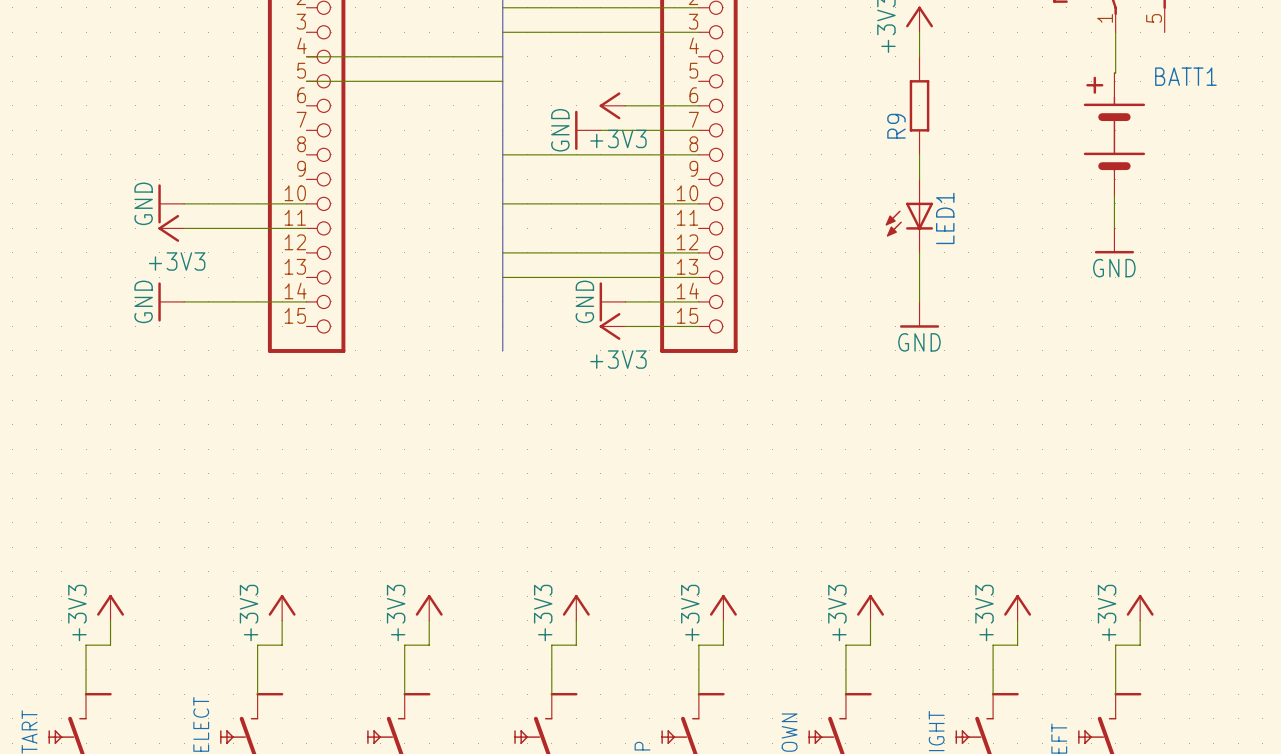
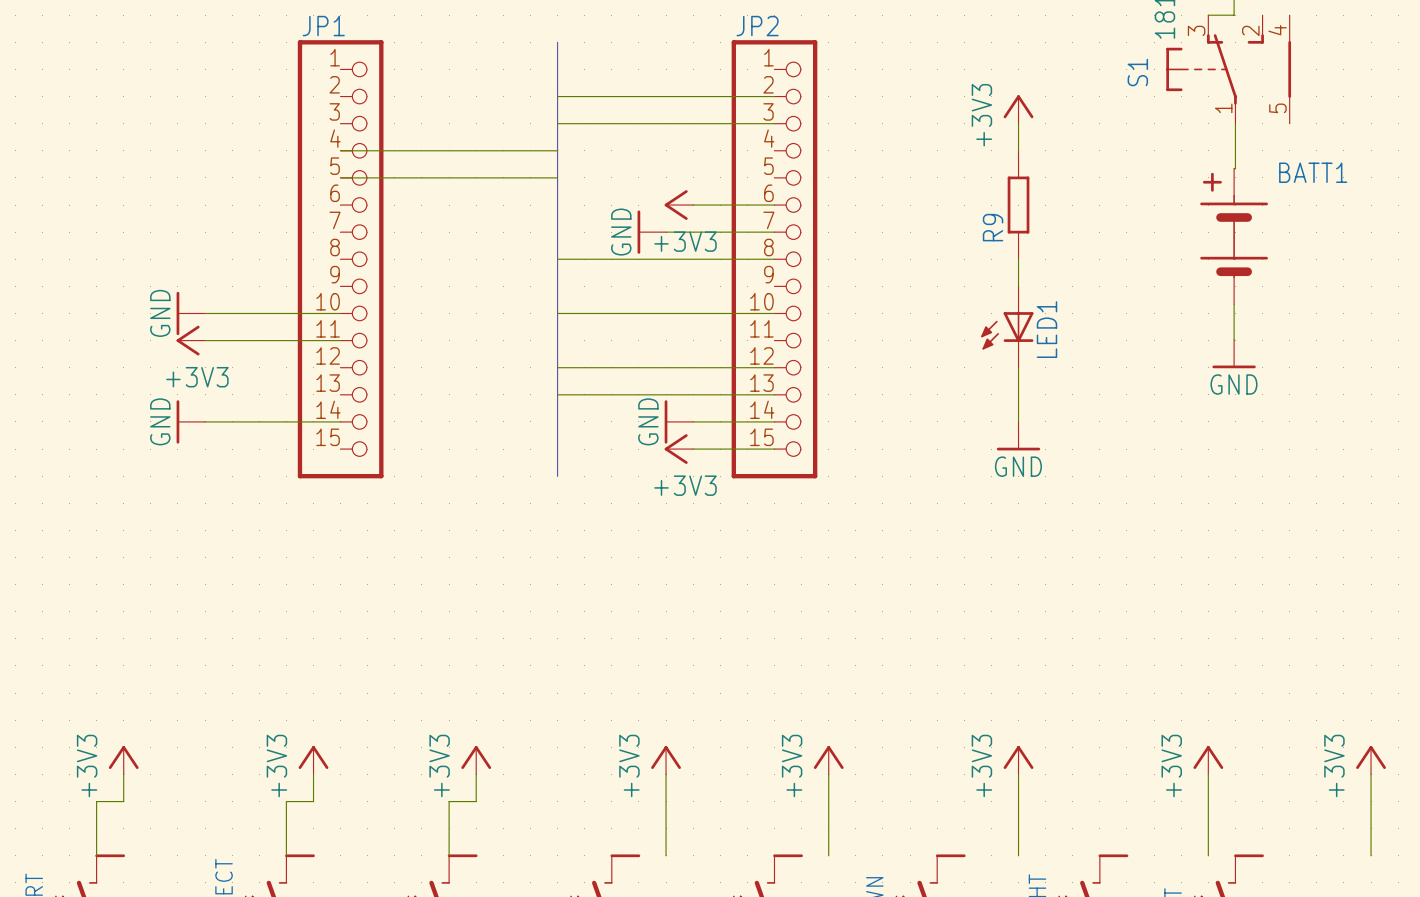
power symbol position: +3V3 (576, 607) -> +3V3 (666, 760)
power symbol position: +3V3 (723, 607) -> +3V3 (828, 760)
power symbol: +3V3 (870, 607) -> none
power symbol: none -> +3V3 (1018, 760)
power symbol: +3V3 (1017, 607) -> none
power symbol: none -> +3V3 (1208, 760)
power symbol: +3V3 (1140, 607) -> none
power symbol: none -> +3V3 (1371, 760)
wire: (576, 620) (576, 645) (551, 645) (551, 694) -> none
wire: none -> (666, 774) (666, 855)
wire: (723, 620) (723, 645) (698, 645) (698, 694) -> none
wire: none -> (828, 774) (828, 855)
wire: (870, 620) (870, 645) (845, 645) (845, 694) -> none
wire: none -> (1018, 774) (1018, 855)
wire: (1017, 620) (1017, 645) (993, 645) (993, 694) -> none
wire: none -> (1208, 774) (1208, 855)
wire: (1140, 620) (1140, 645) (1115, 645) (1115, 694) -> none
wire: none -> (1371, 774) (1371, 855)

